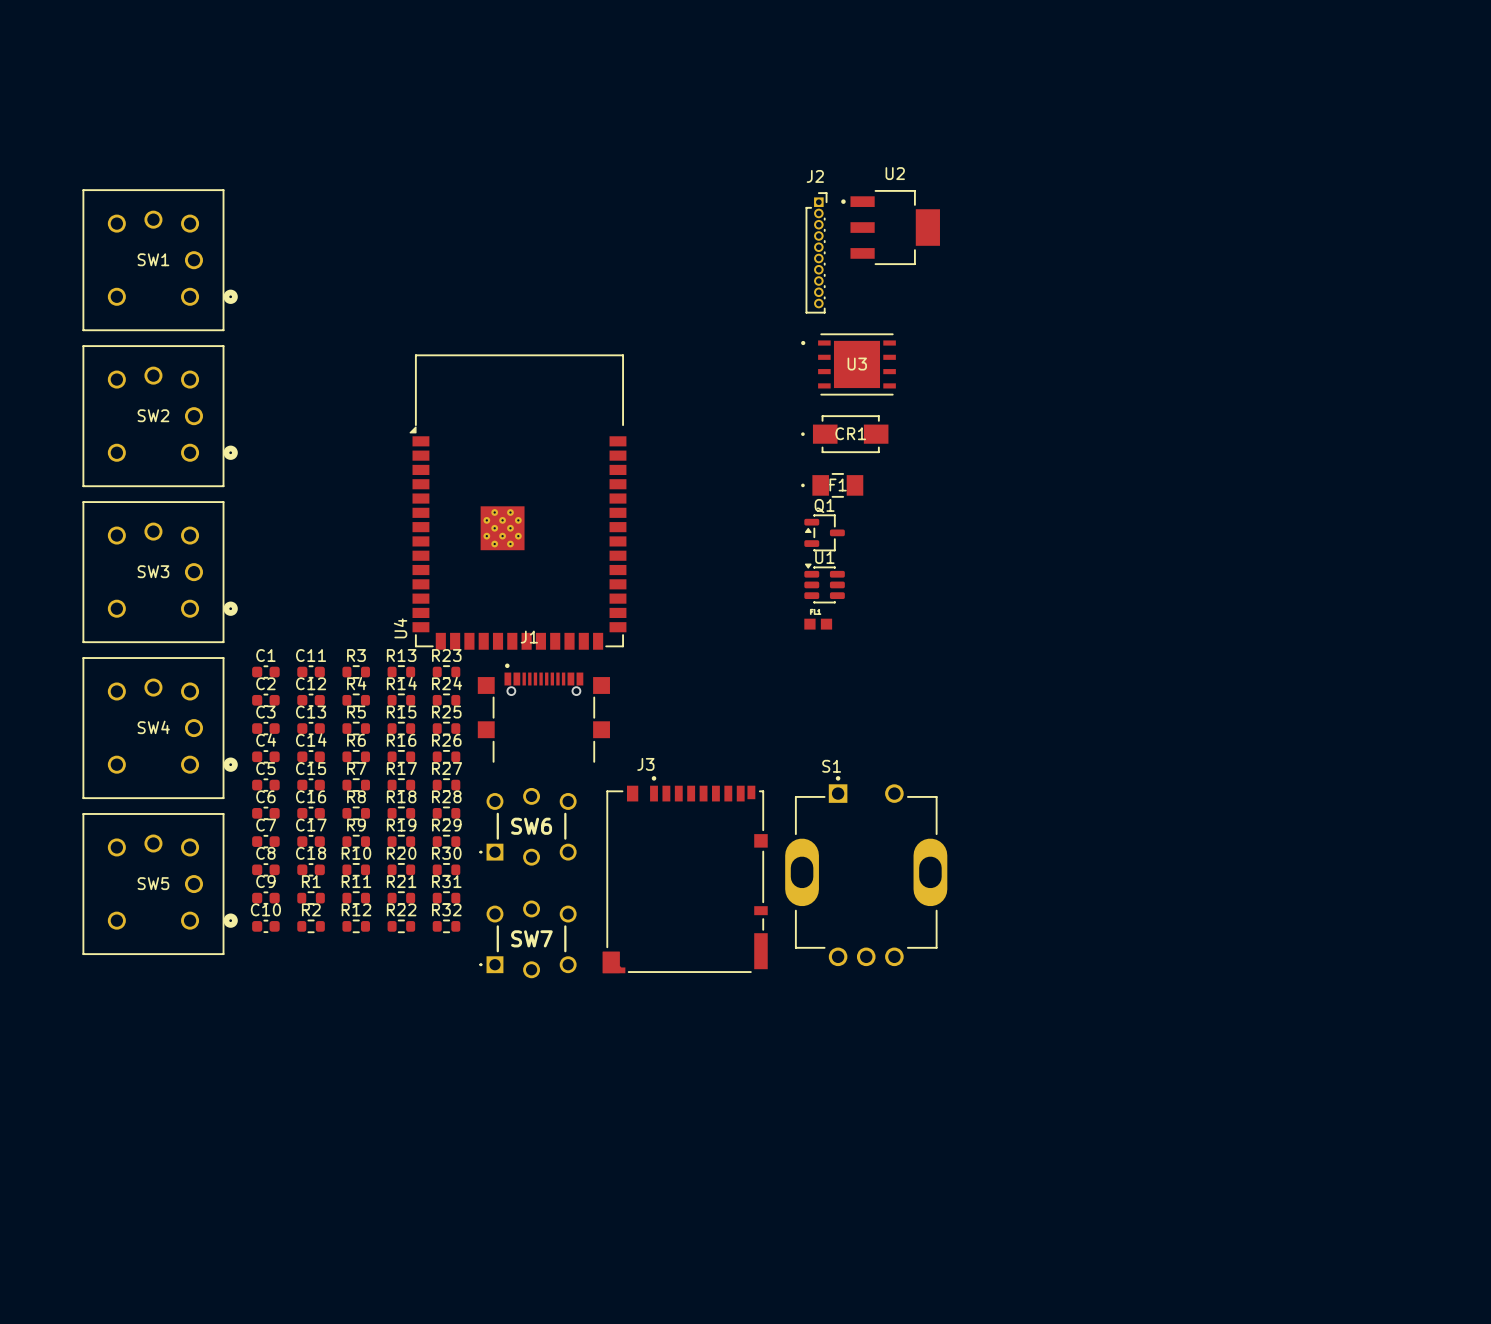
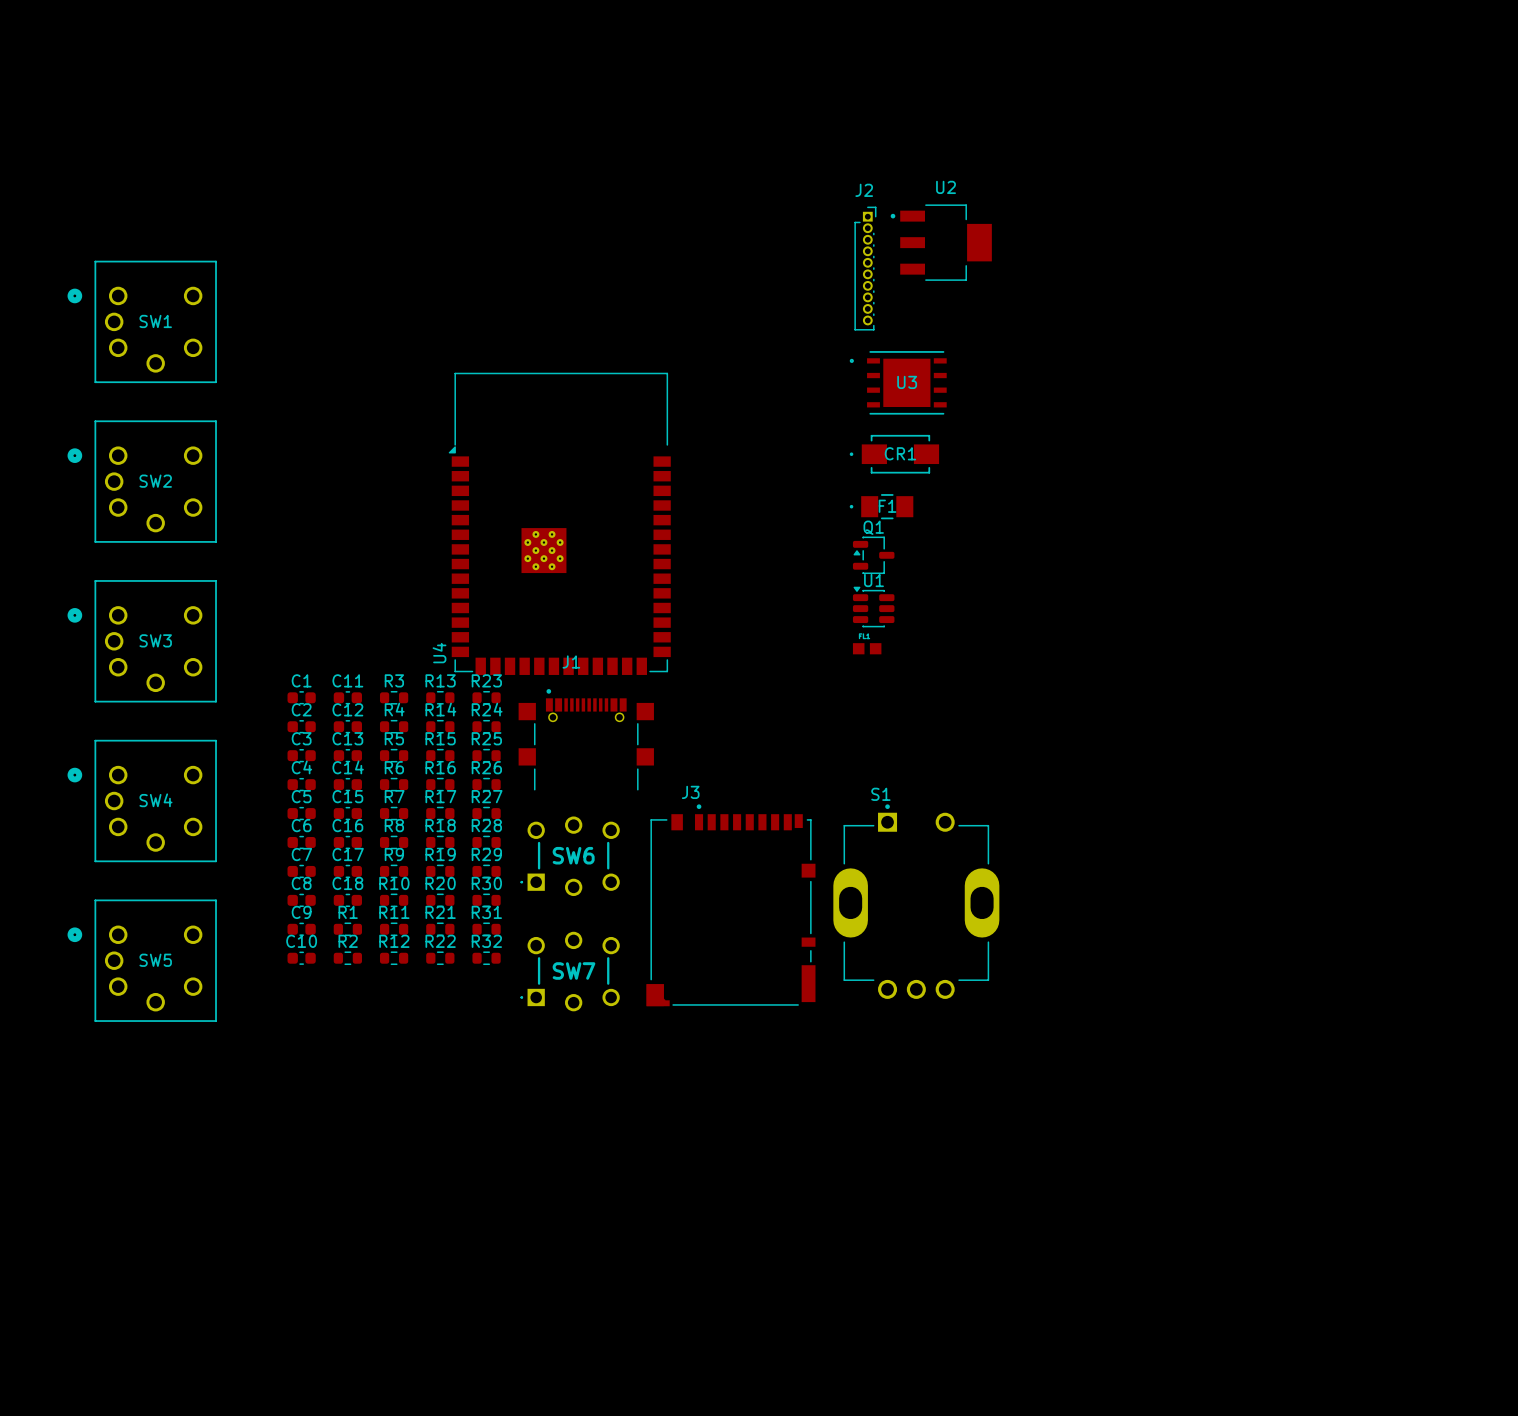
SW1 footprint: [82, 189, 238, 332] -> [67, 260, 217, 384]
SW2 footprint: [82, 345, 238, 488] -> [67, 420, 217, 543]
SW3 footprint: [82, 501, 238, 644] -> [67, 580, 217, 703]
SW4 footprint: [82, 657, 238, 800] -> [67, 739, 217, 863]
SW5 footprint: [82, 813, 238, 955] -> [67, 899, 217, 1022]

